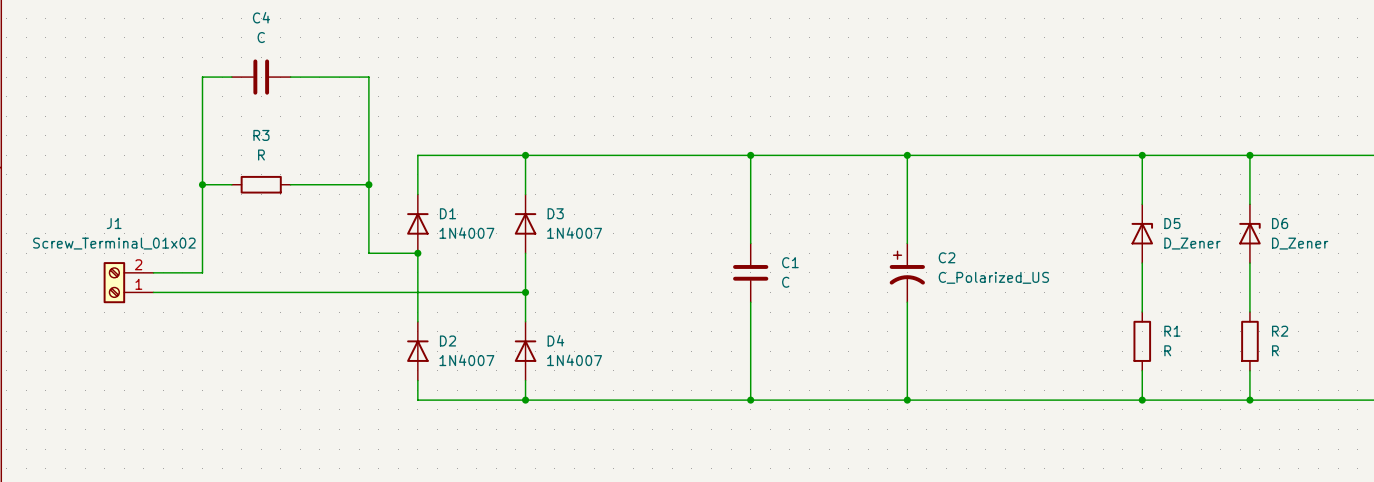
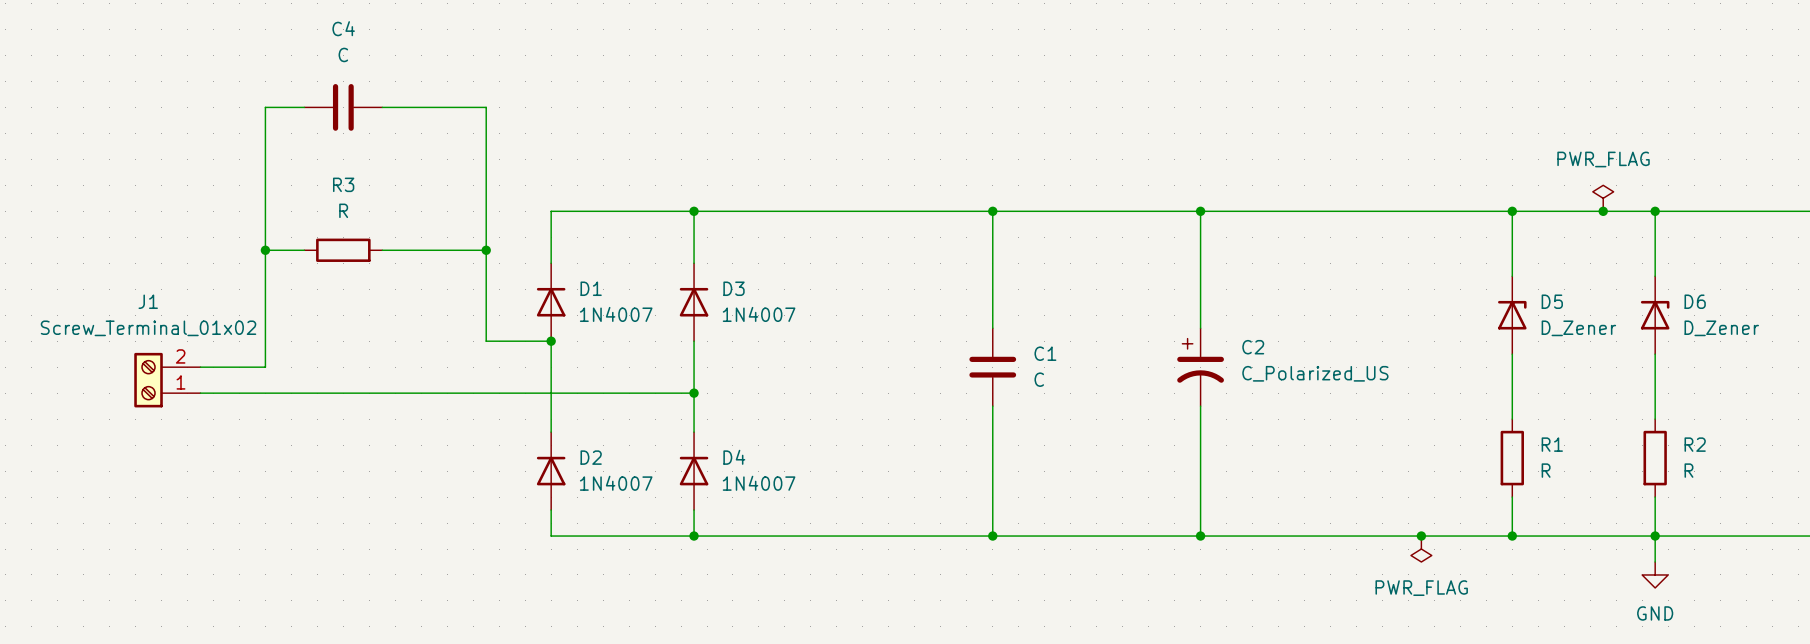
power symbol: none -> PWR_FLAG (1603, 198)
junction: none -> (1603, 211)
junction: none -> (1421, 536)
wire: none -> (1655, 536) (1655, 562)
power symbol: none -> PWR_FLAG (1421, 549)
power symbol: none -> GND (1655, 574)

